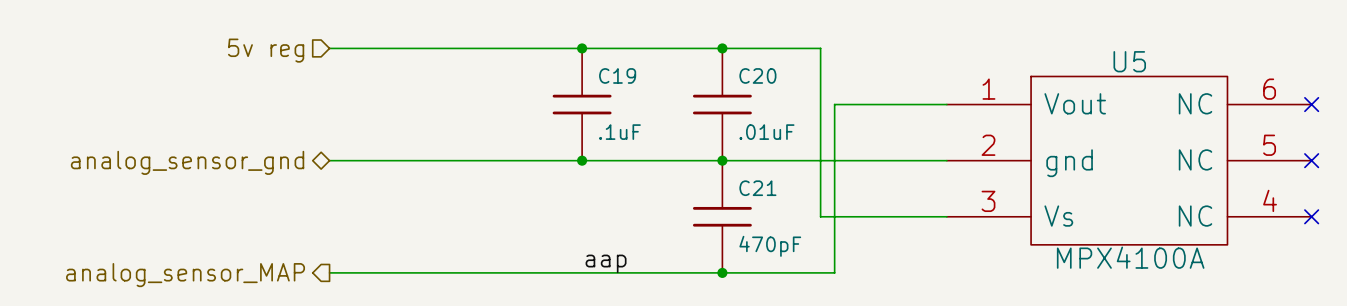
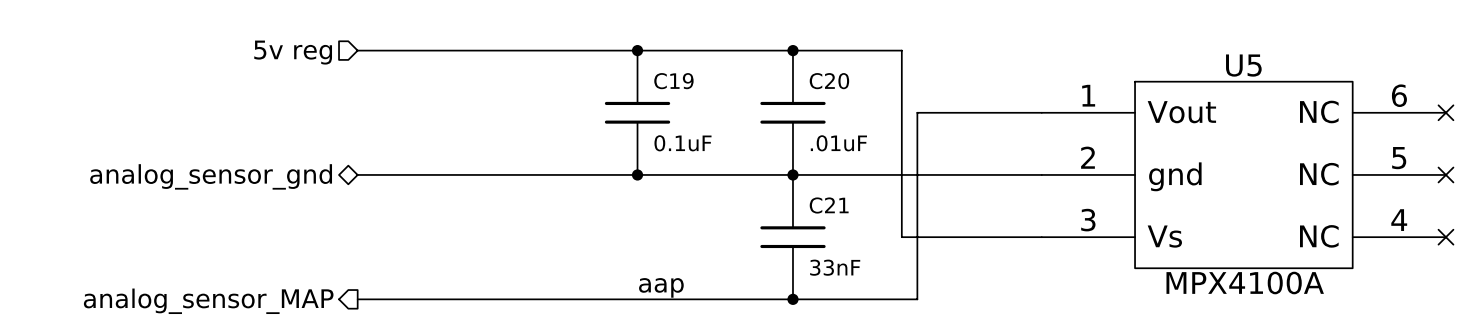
C19 value: .1uF (619, 132) -> 0.1uF (683, 143)
C21 value: 470pF (770, 246) -> 33nF (835, 267)

